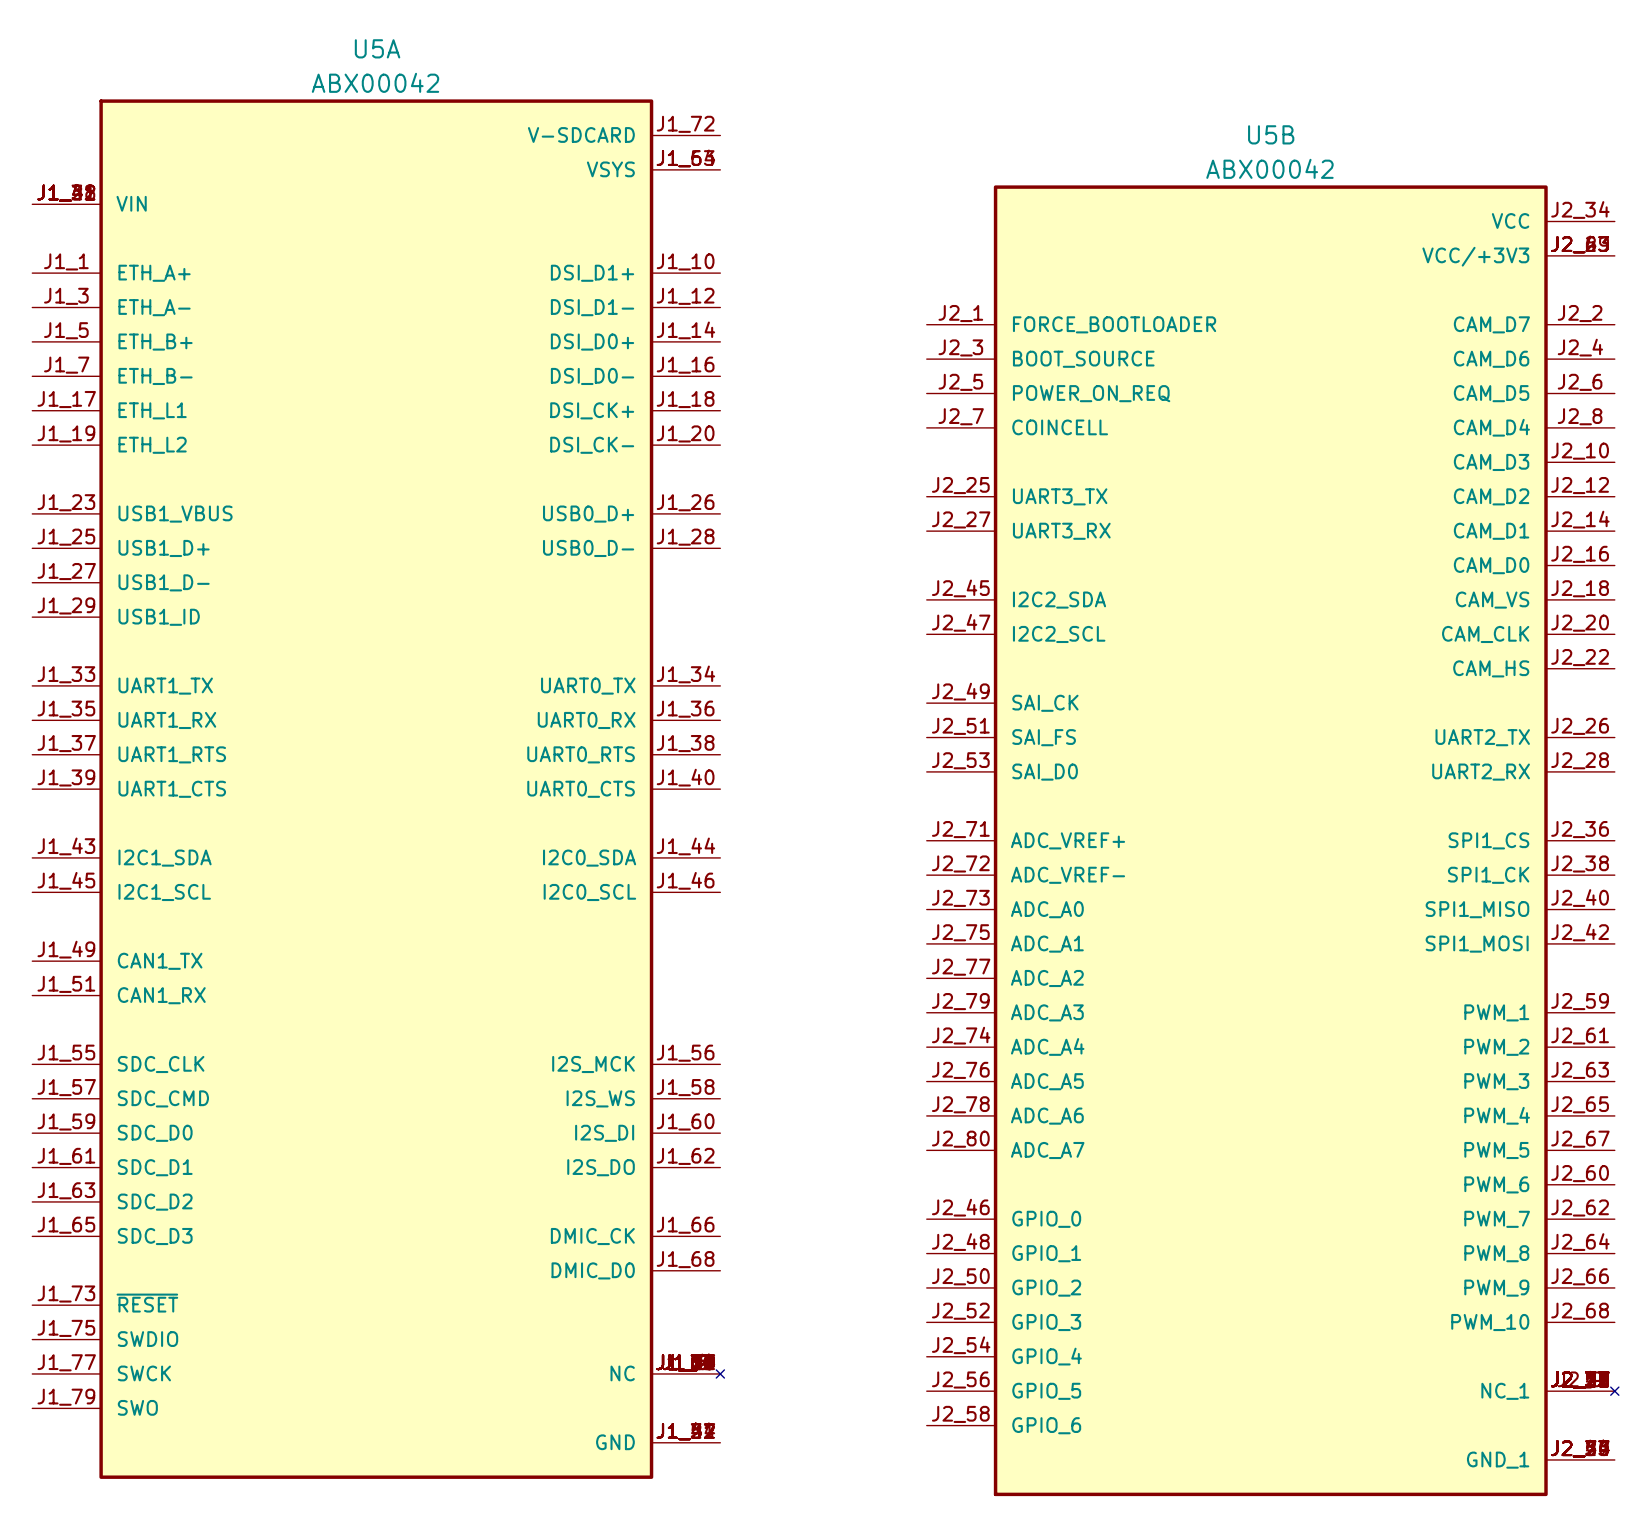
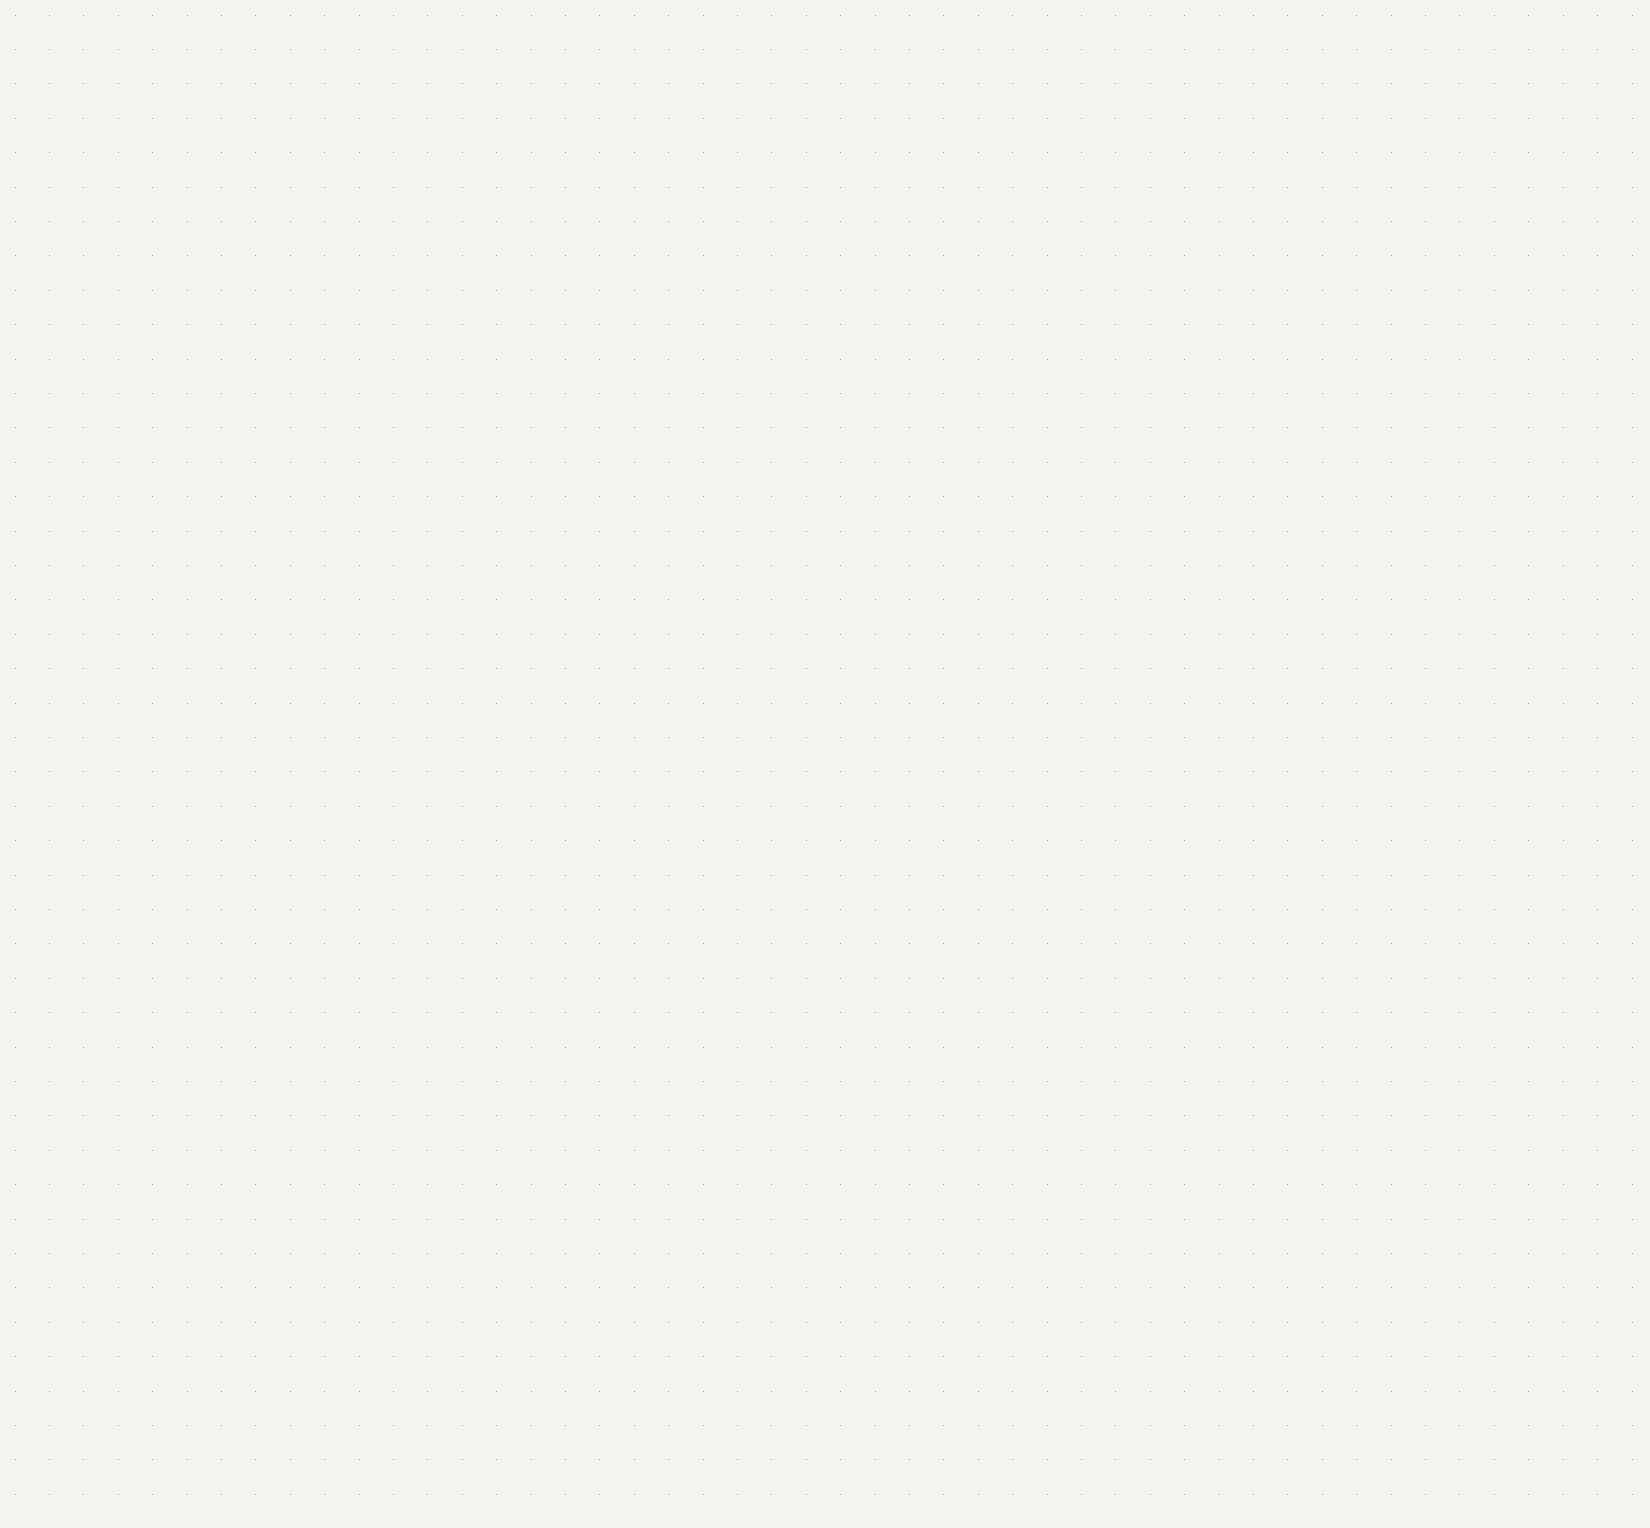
U5A: ABX00042 (378, 789) -> none
U5B: ABX00042 (1272, 840) -> none

